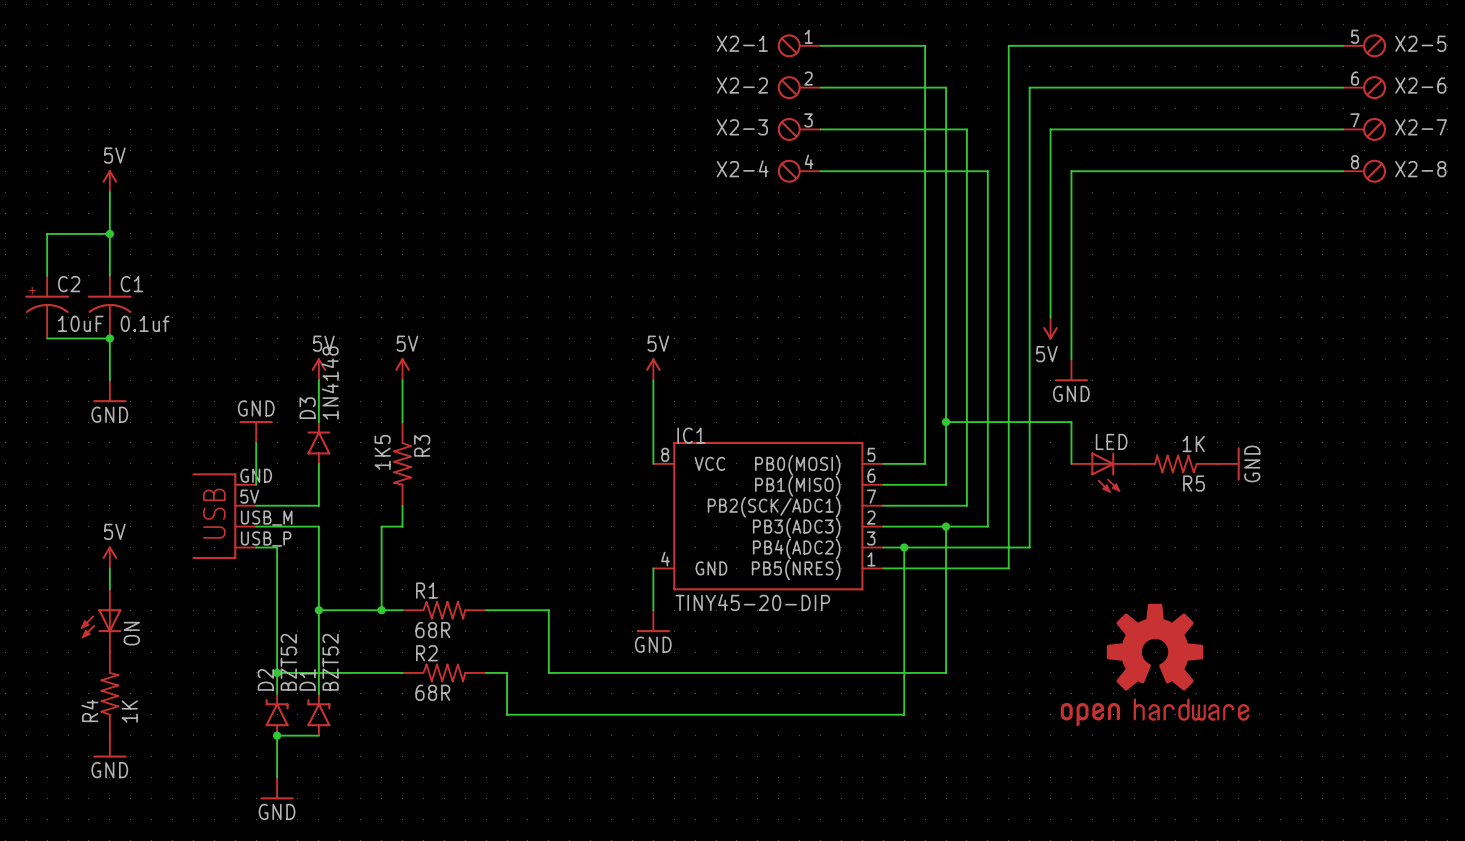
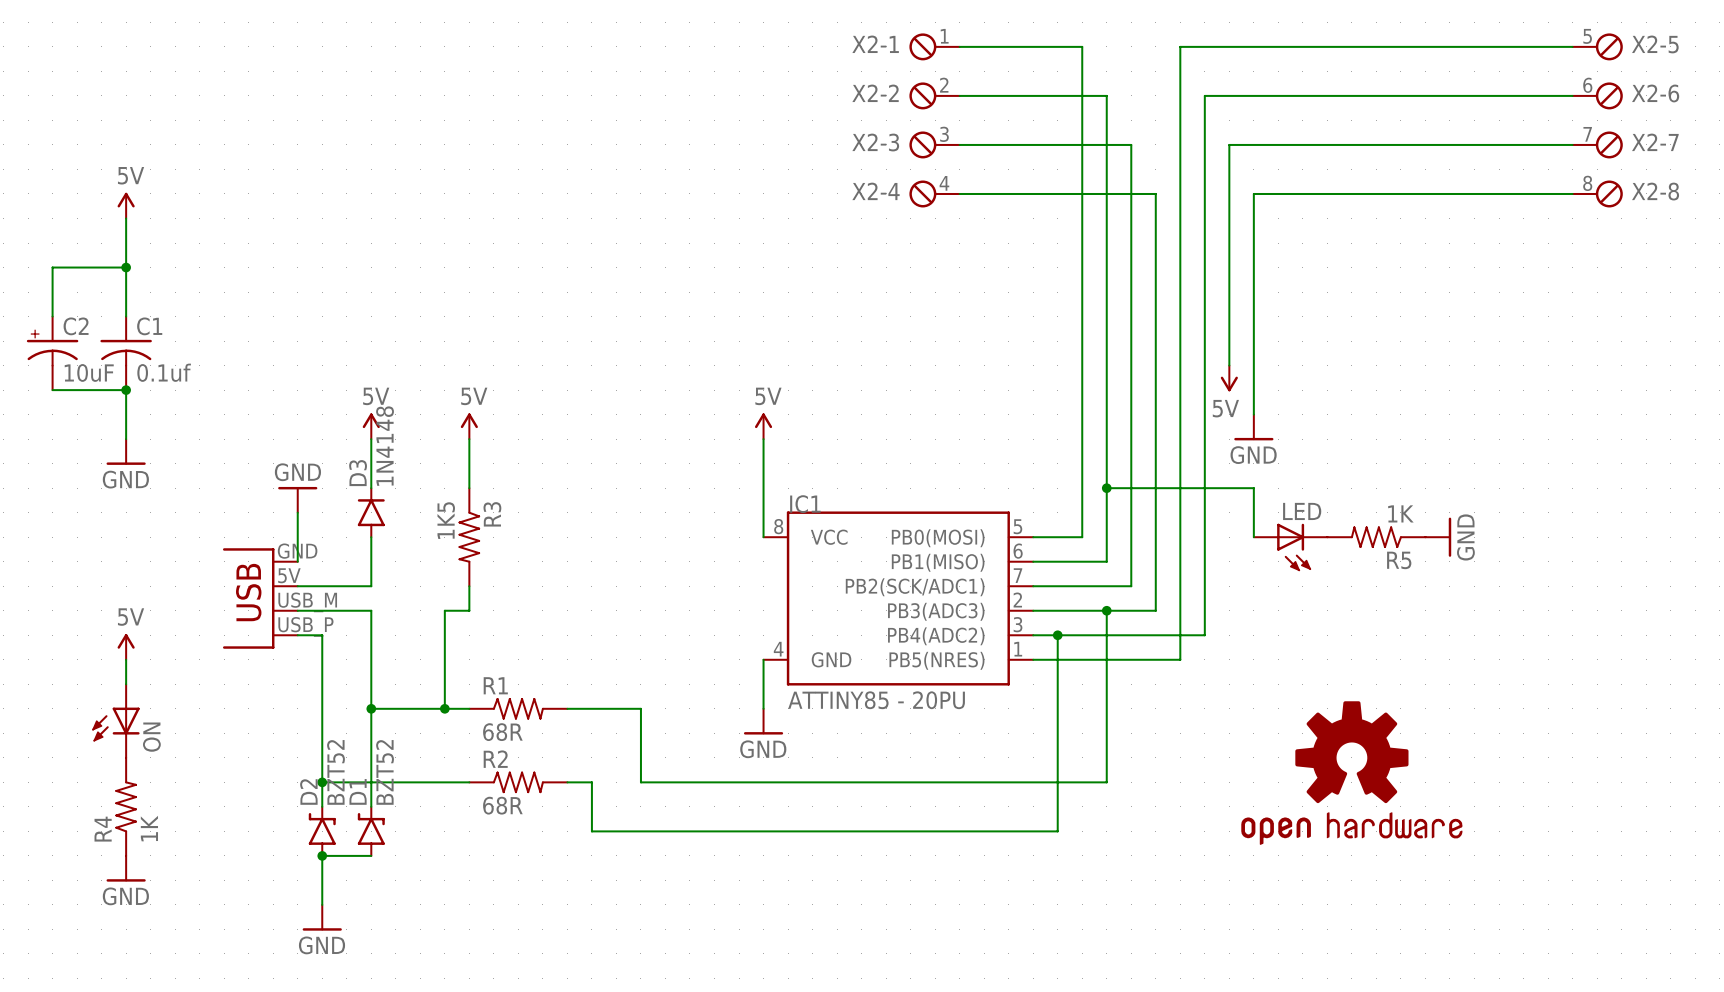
IC1 value: TINY45-20-DIP (752, 602) -> ATTINY85 - 20PU (876, 700)

